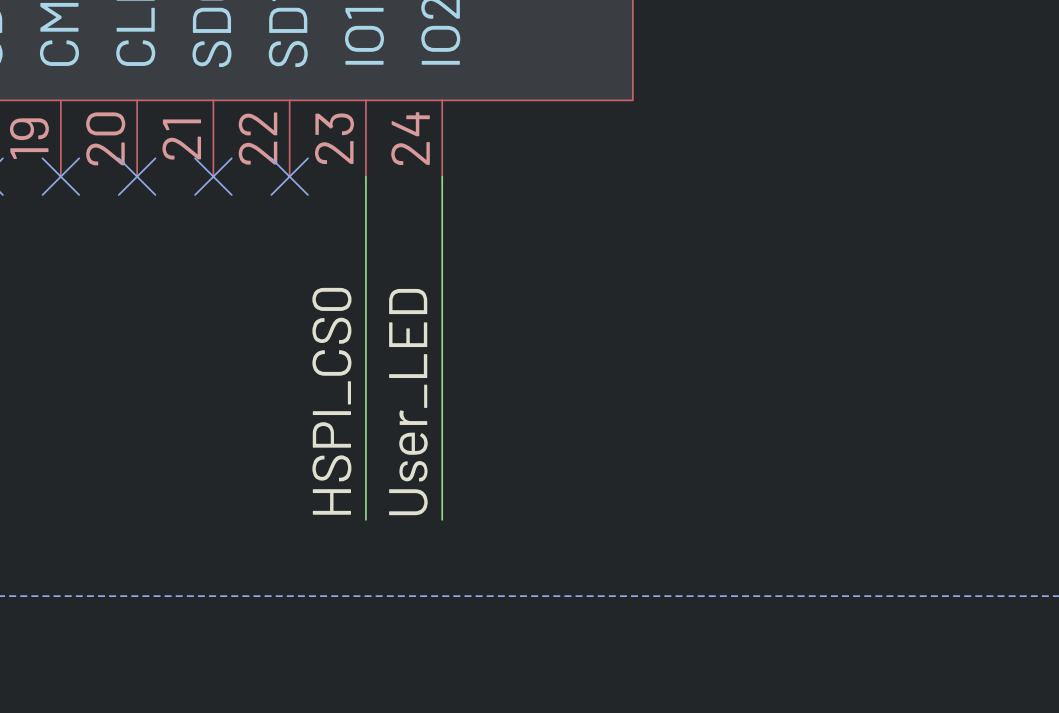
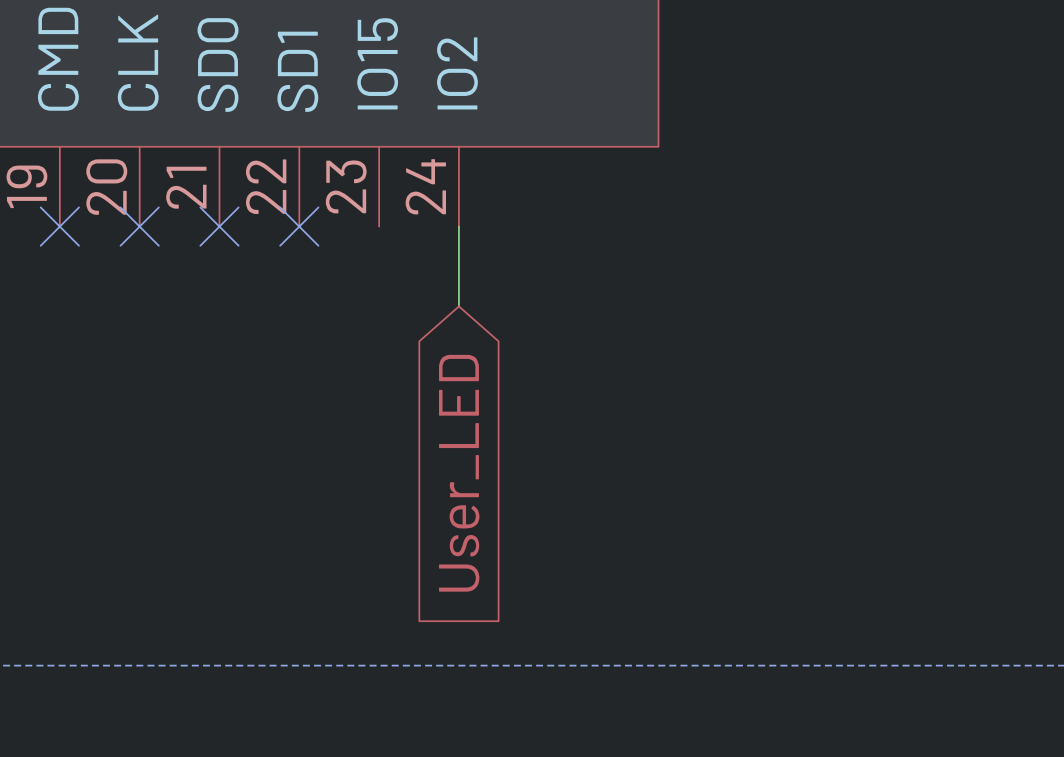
wire: (365, 176) (365, 519) -> none
wire: (442, 252) (442, 519) -> none
label: HSPI_CS0 (331, 401) -> none
label: User_LED (408, 402) -> none
global label: none -> User_LED (459, 473)

